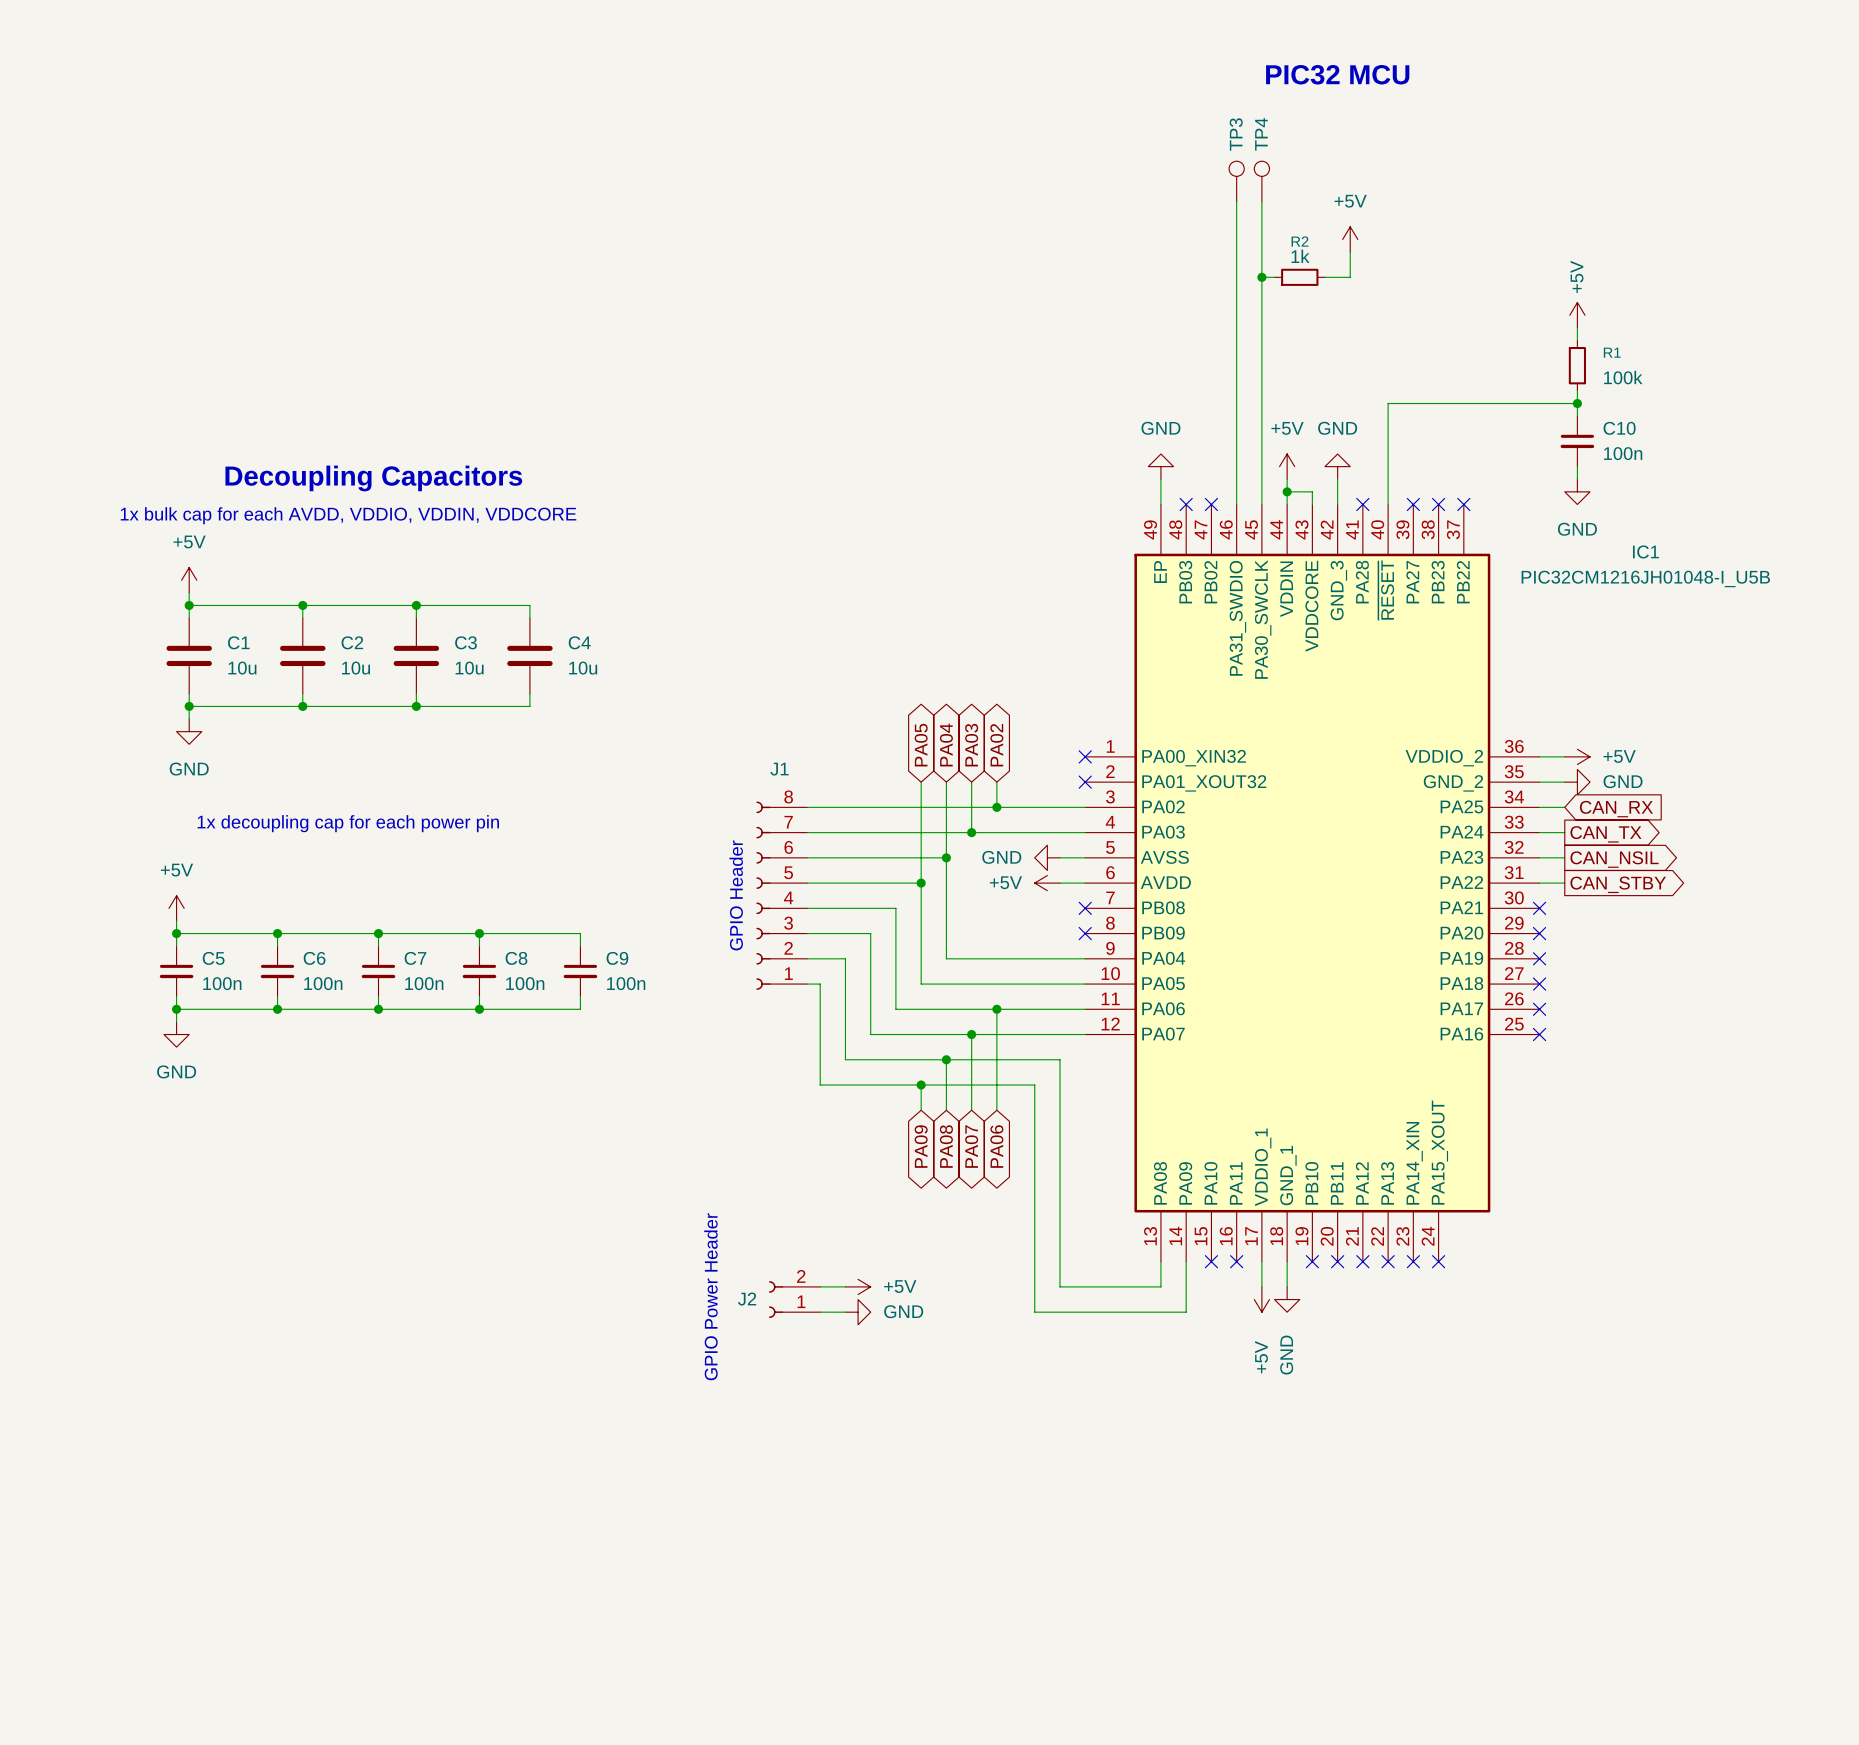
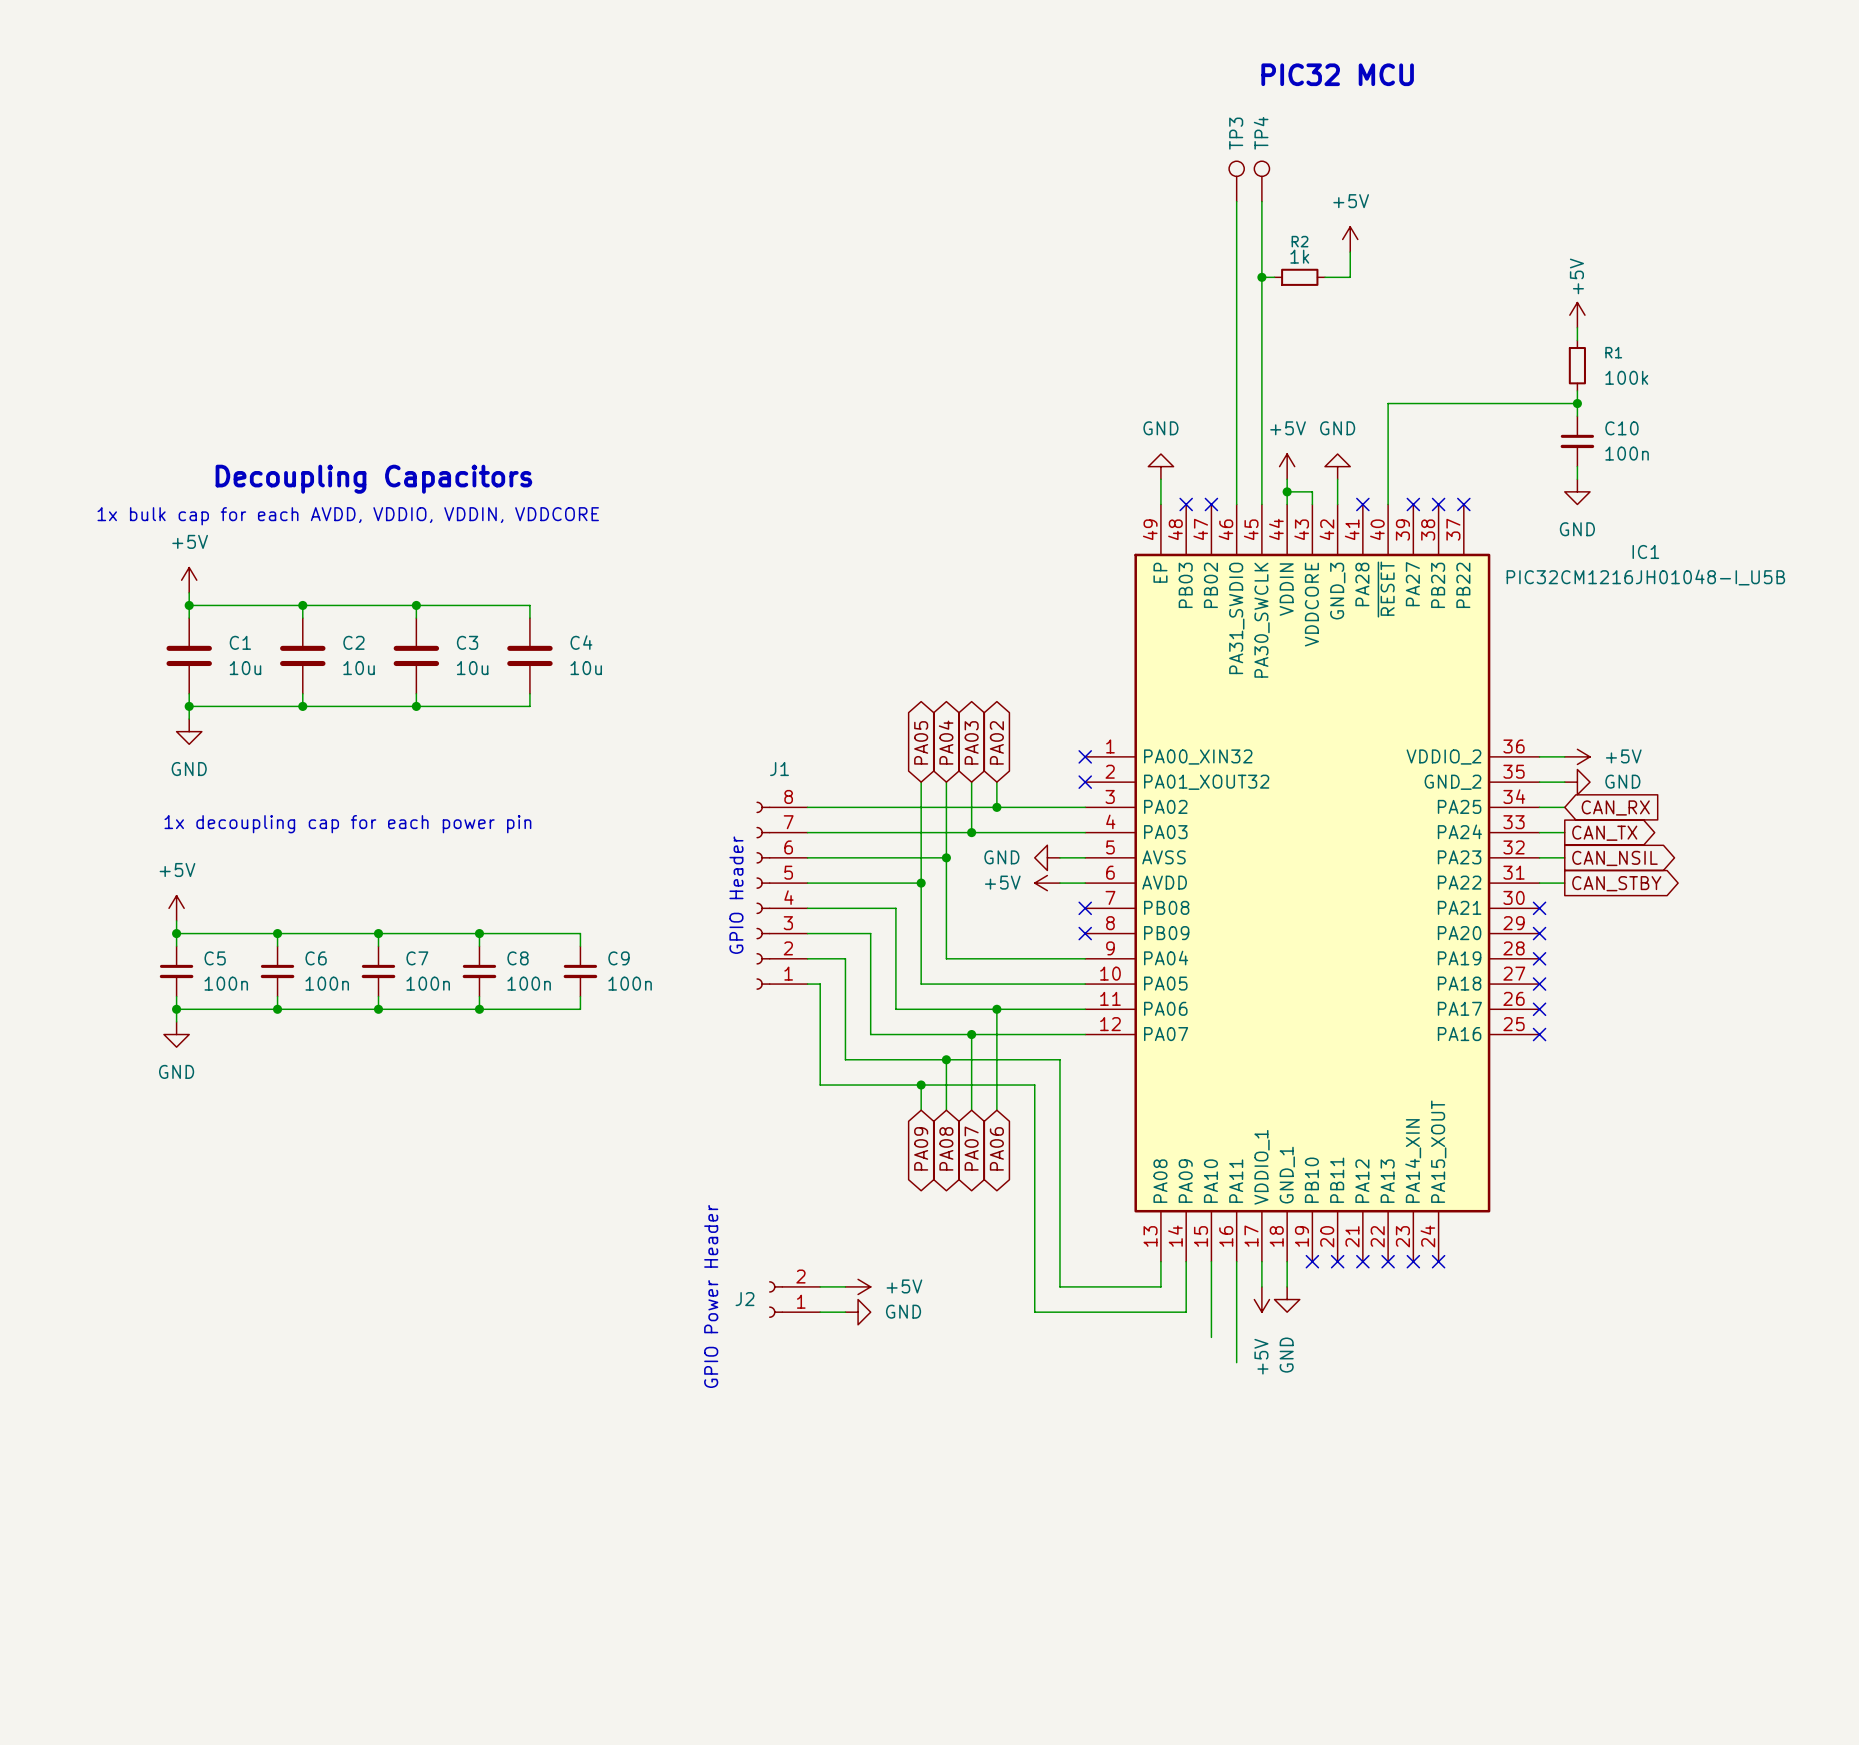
wire: none -> (1211, 1261) (1211, 1337)
no-connect mark: (1211, 1261) -> none
wire: none -> (1236, 1261) (1236, 1362)
no-connect mark: (1236, 1261) -> none

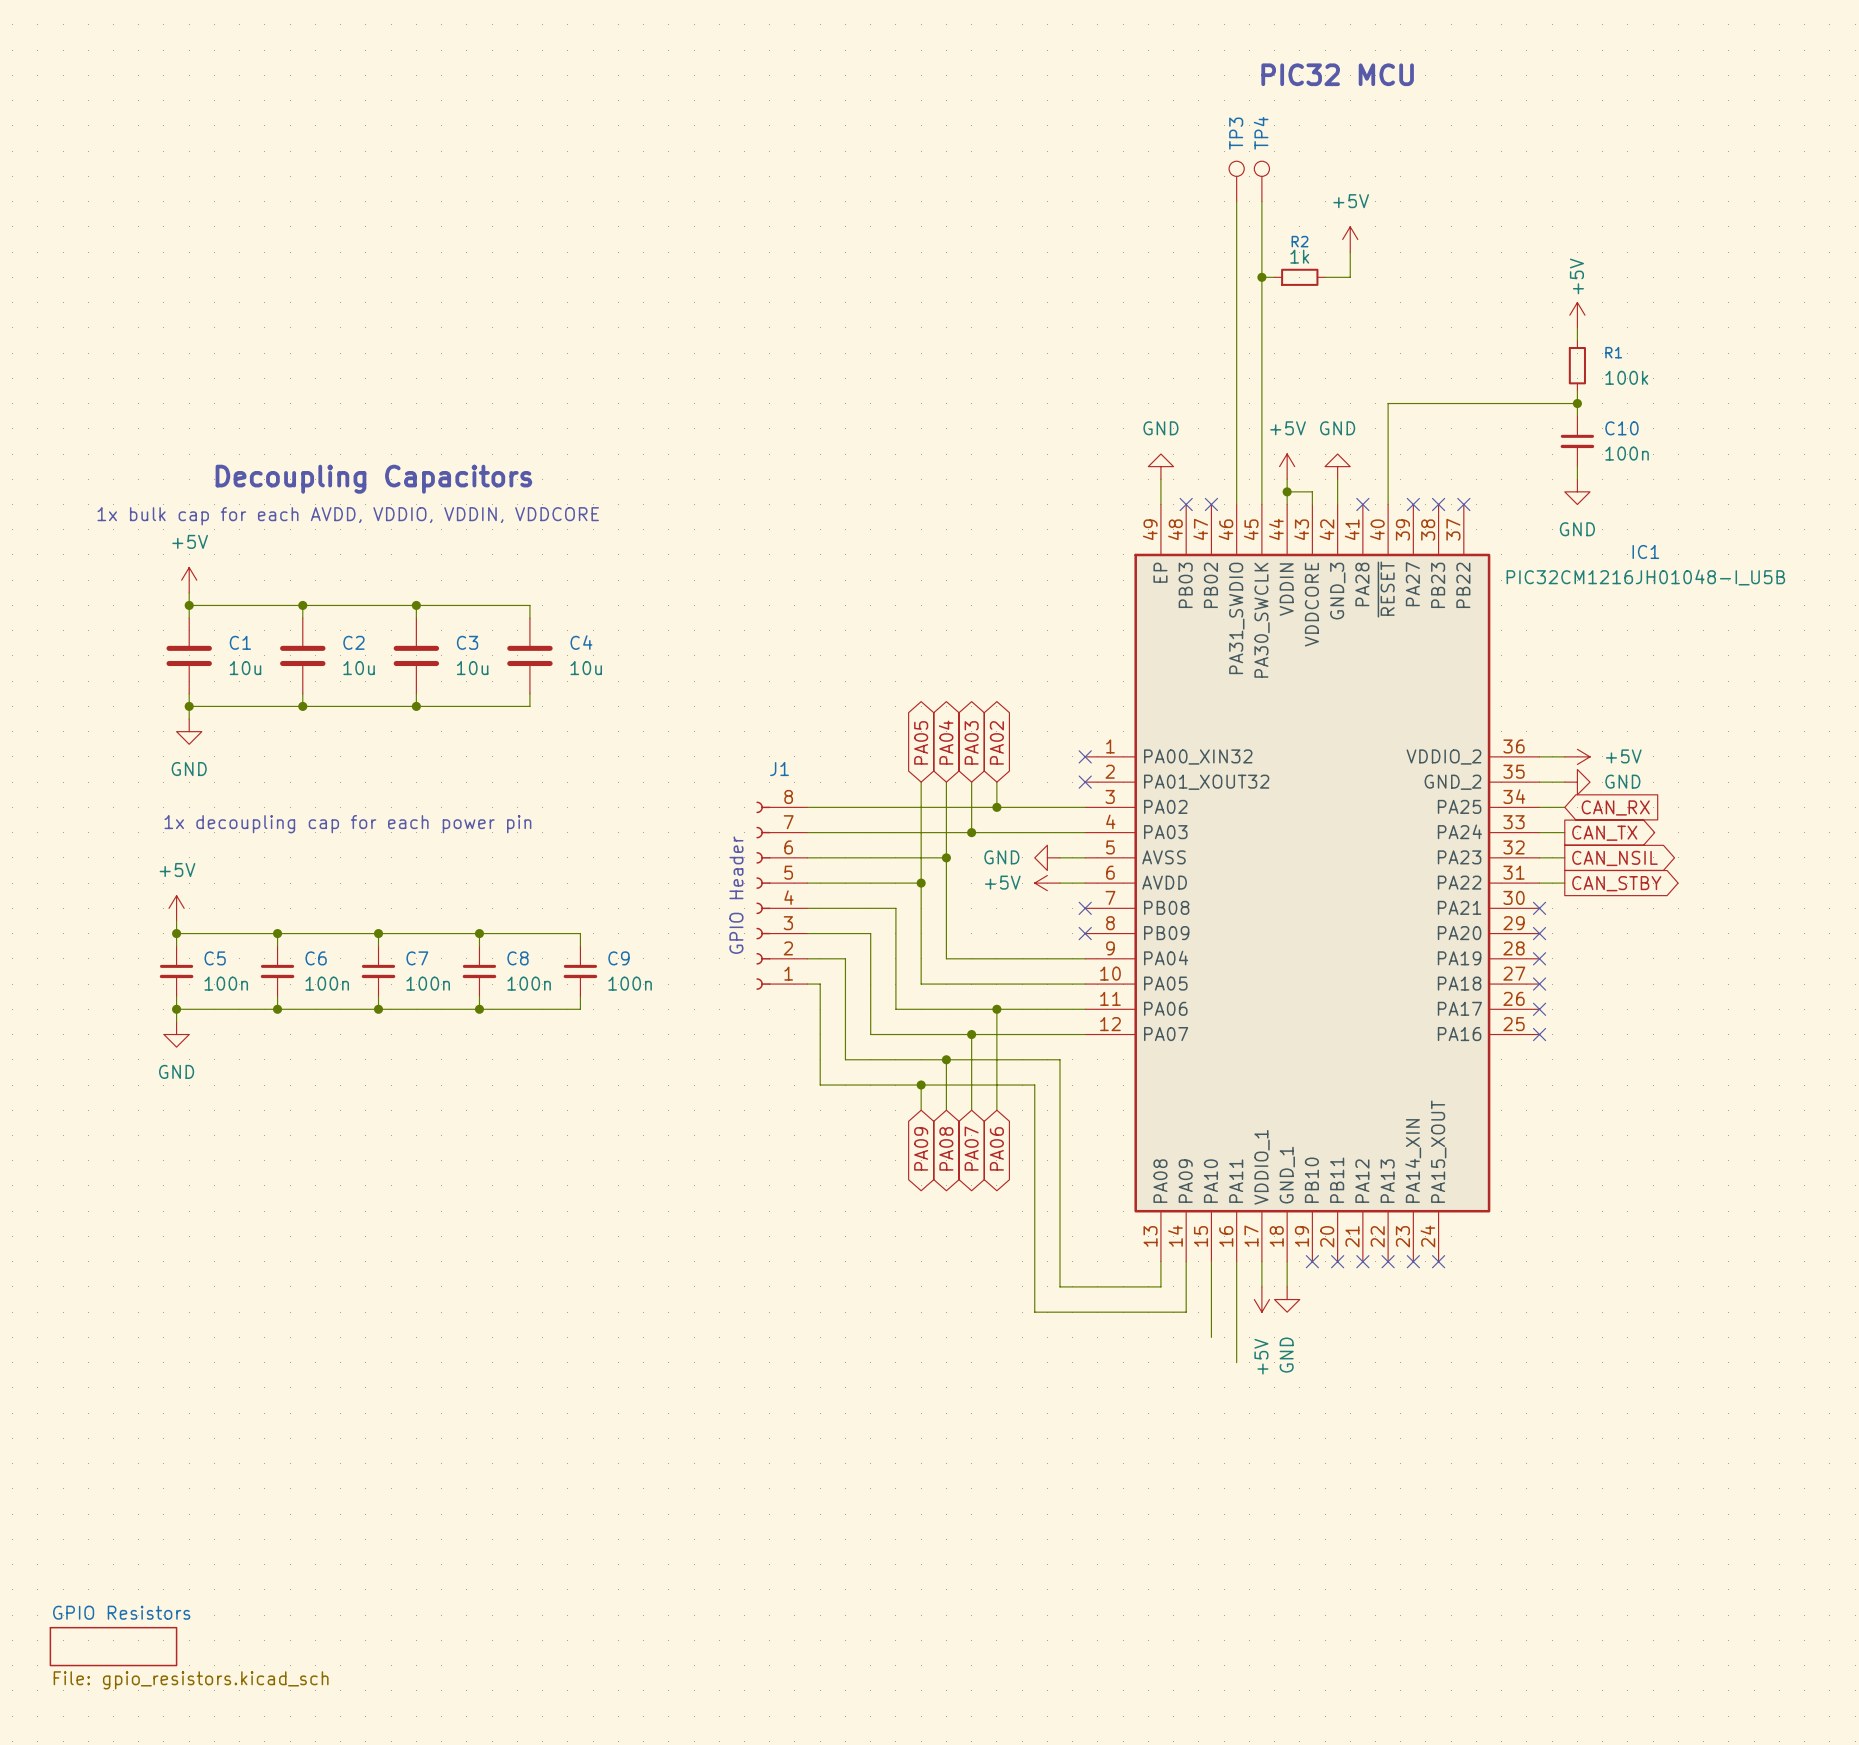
wire: (820, 1286) (845, 1286) -> none
power symbol: +5V (858, 1286) -> none
text: GPIO Power Header (711, 1296) -> none
J2: (794, 1299) -> none
wire: (820, 1312) (845, 1312) -> none
power symbol: GND (858, 1312) -> none
sheet GPIO Resistors: none -> File: gpio_resistors.kicad_sch (113, 1646)

